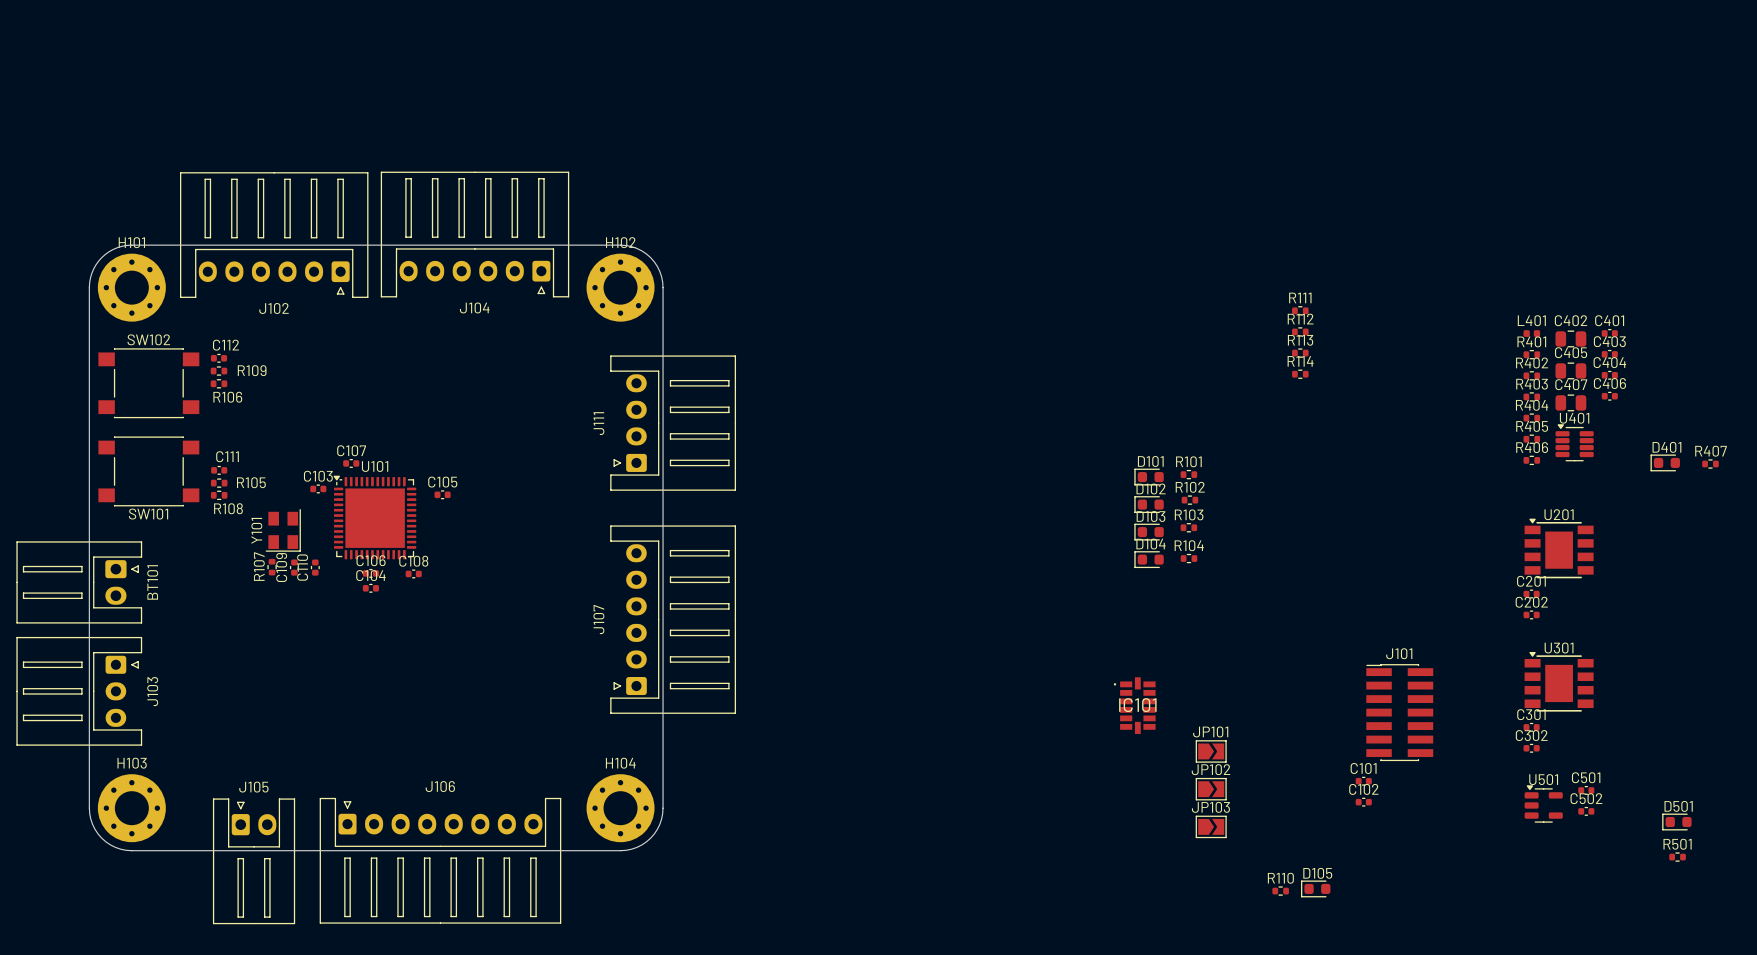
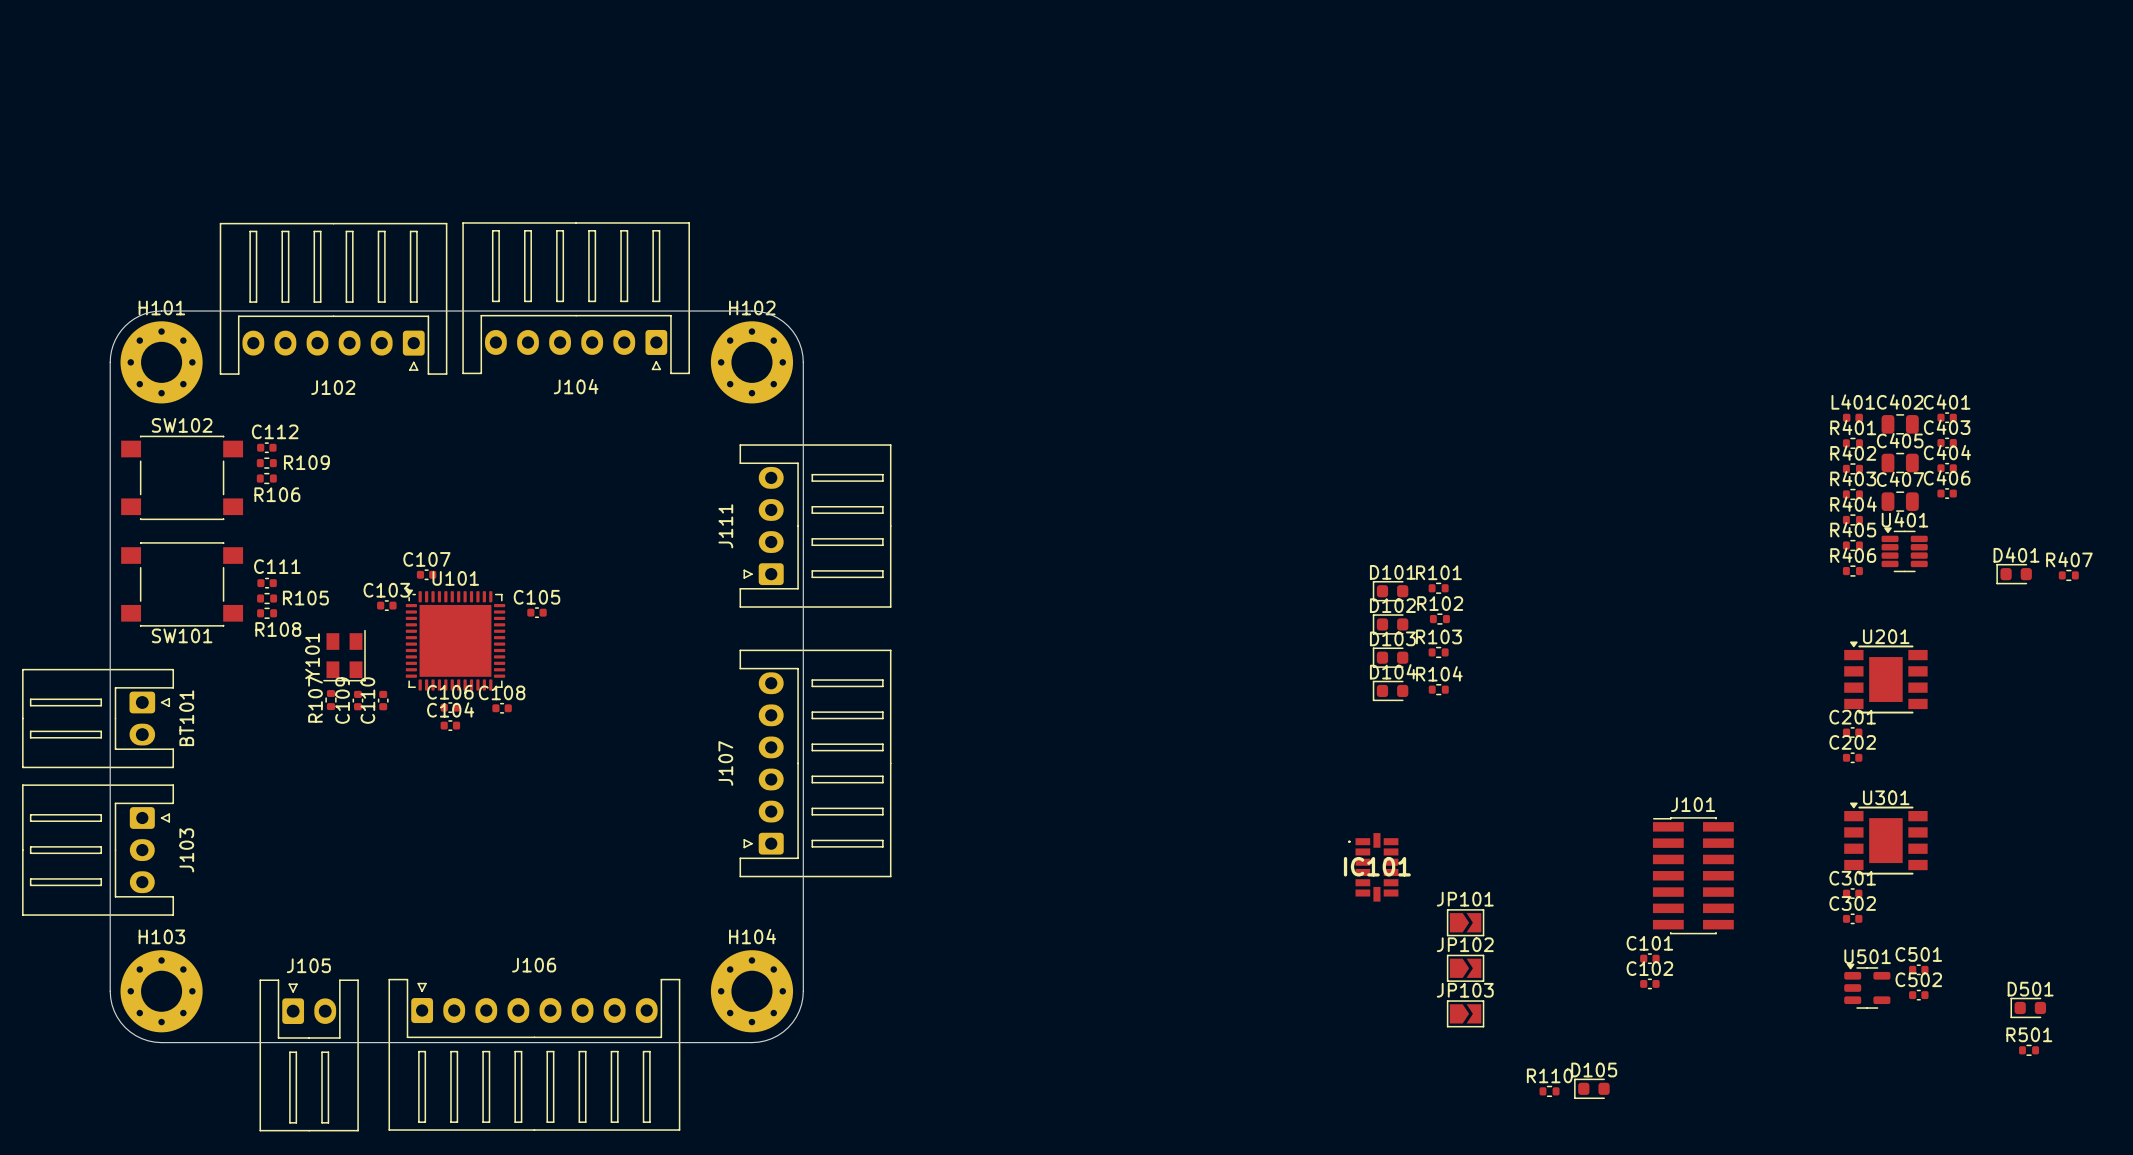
R111: (1300, 310) -> none
R112: (1300, 331) -> none
R113: (1300, 353) -> none
R114: (1300, 374) -> none

